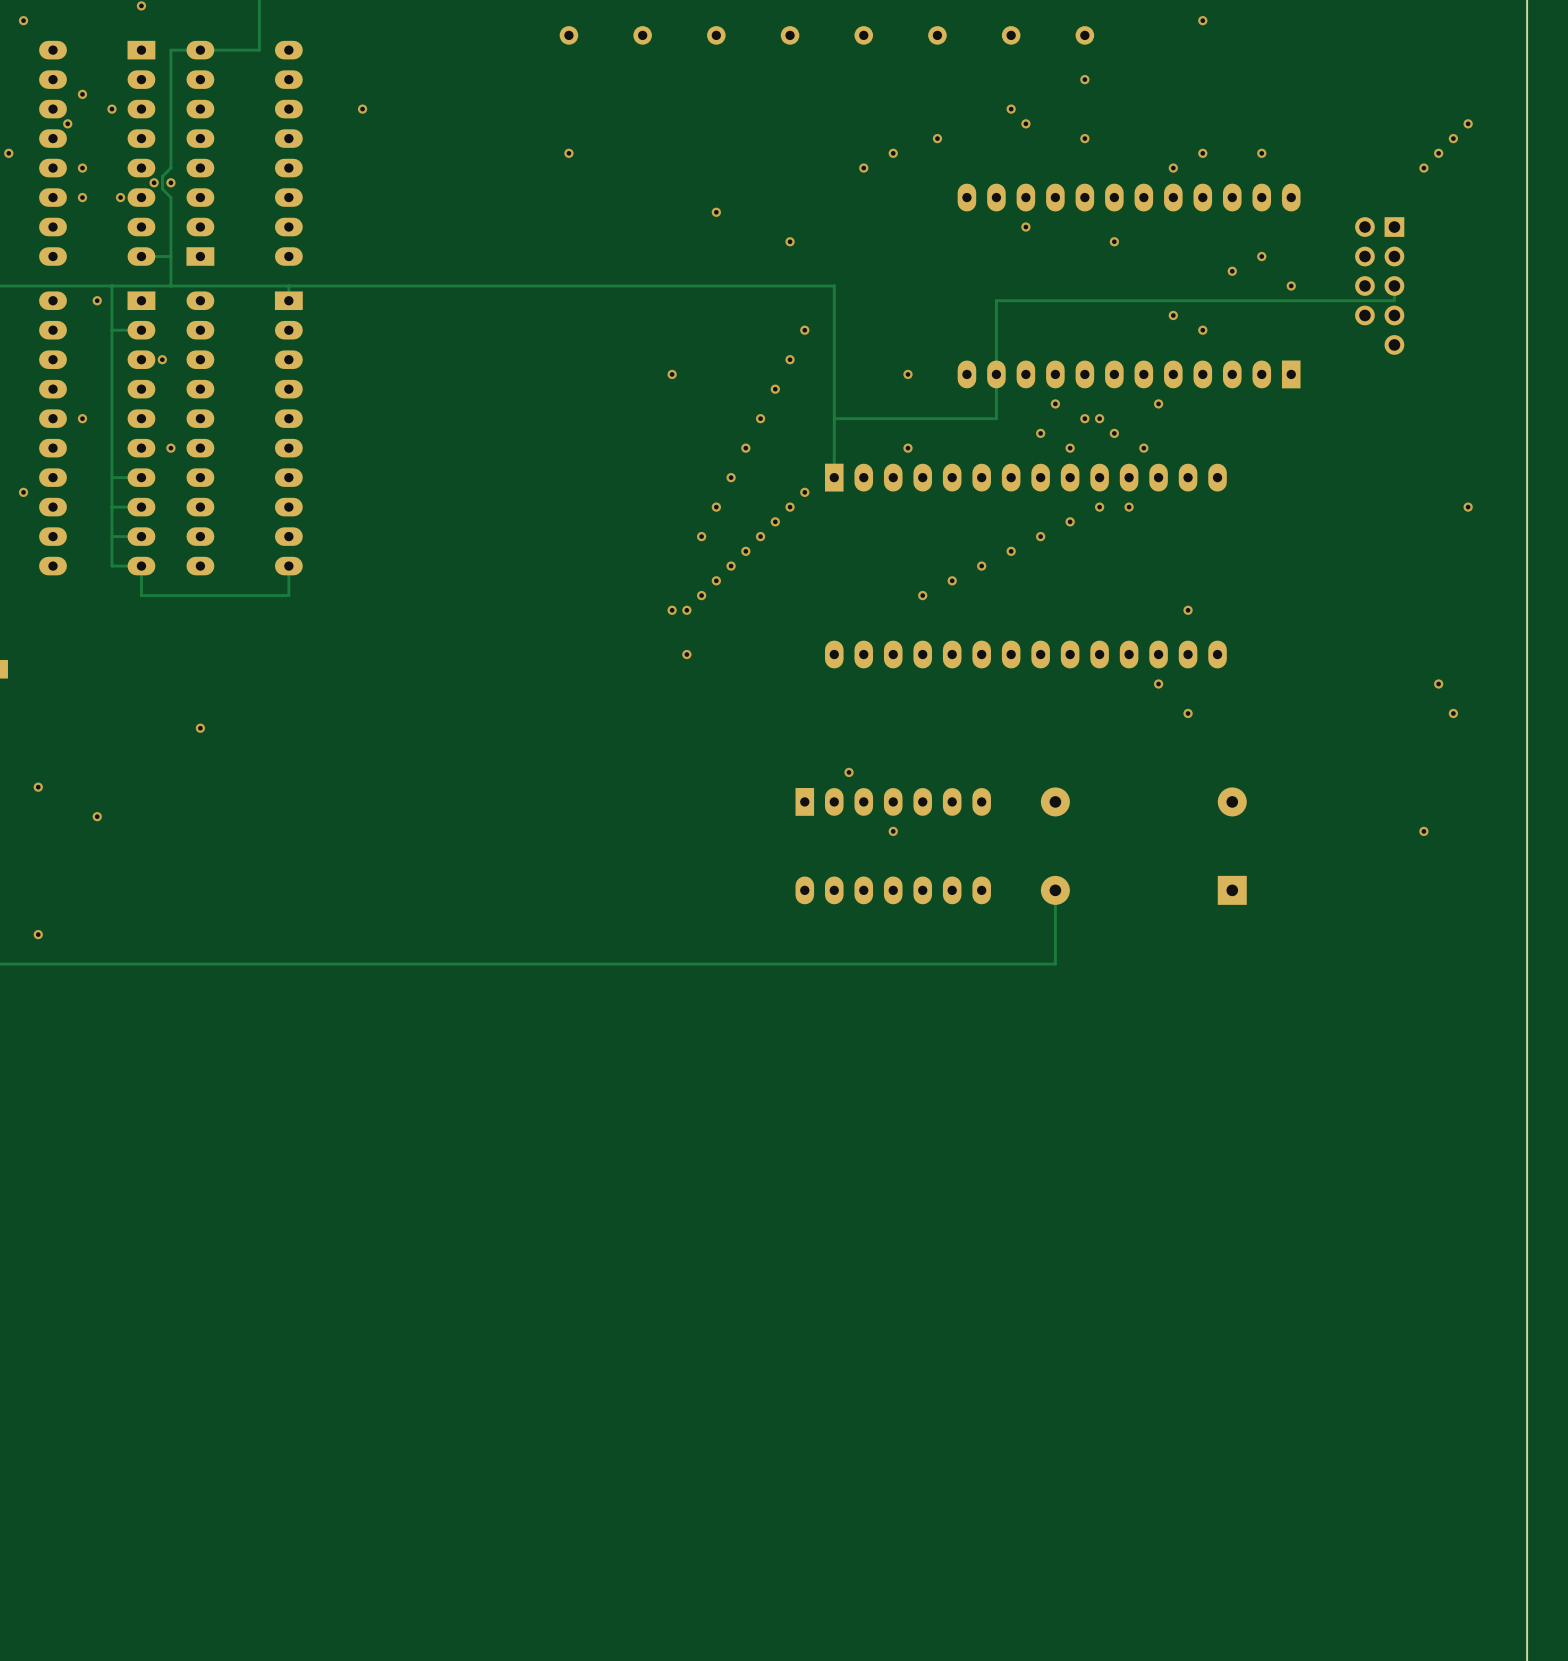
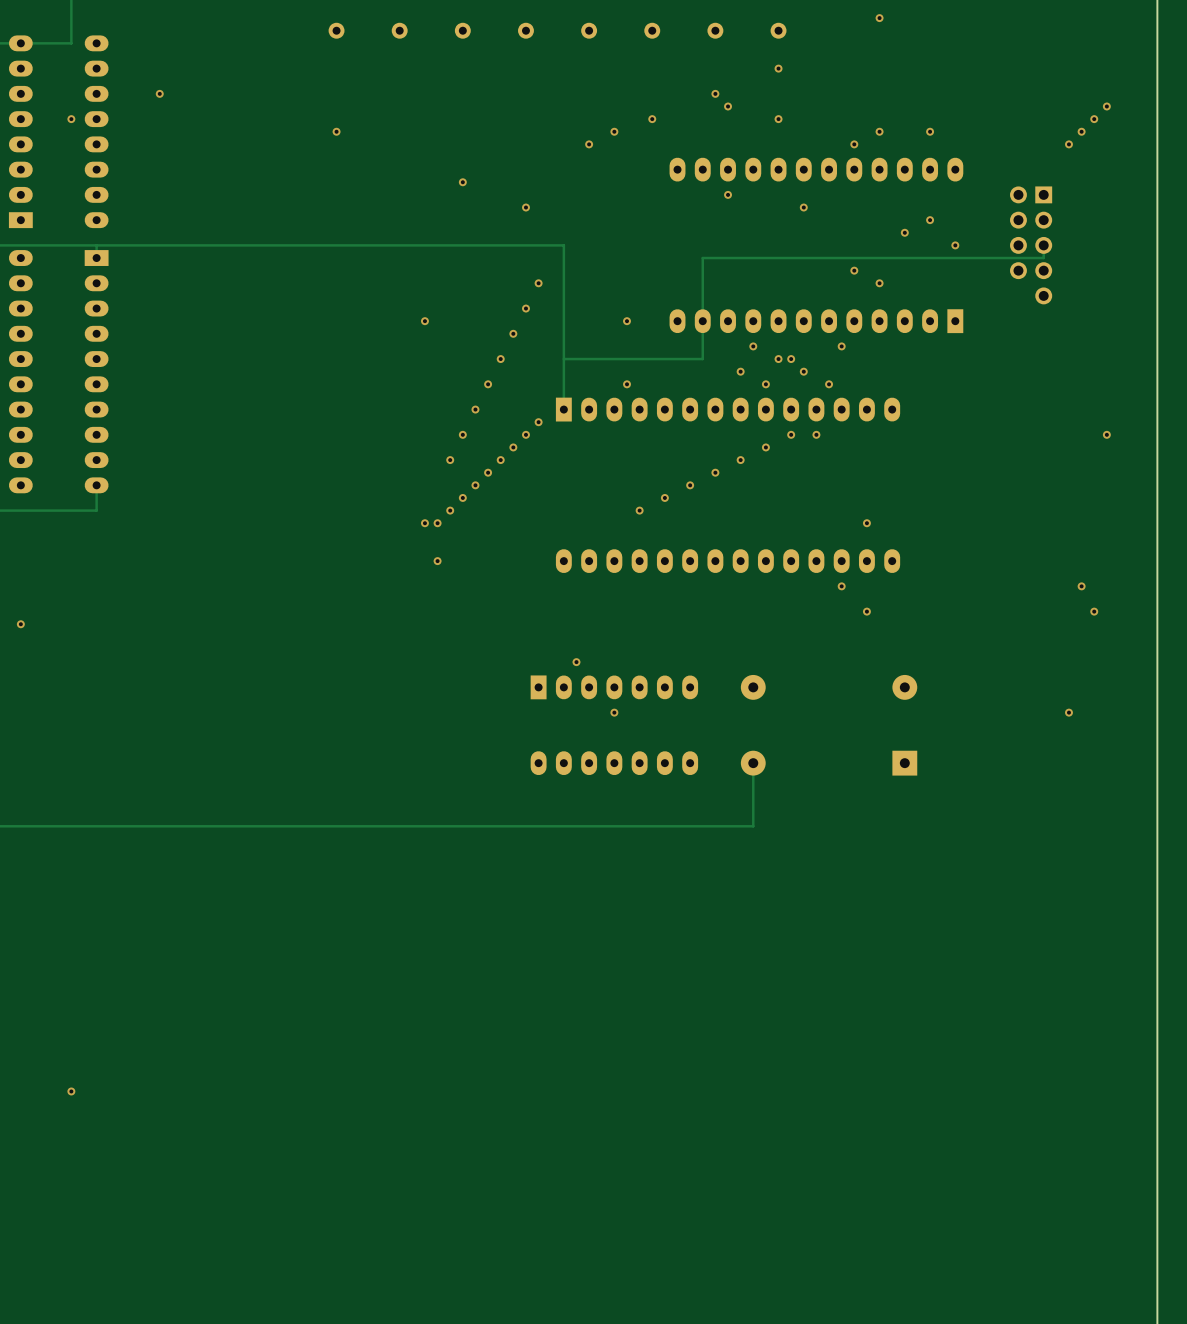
via: none -> (71, 119)
via: none -> (71, 1091)

